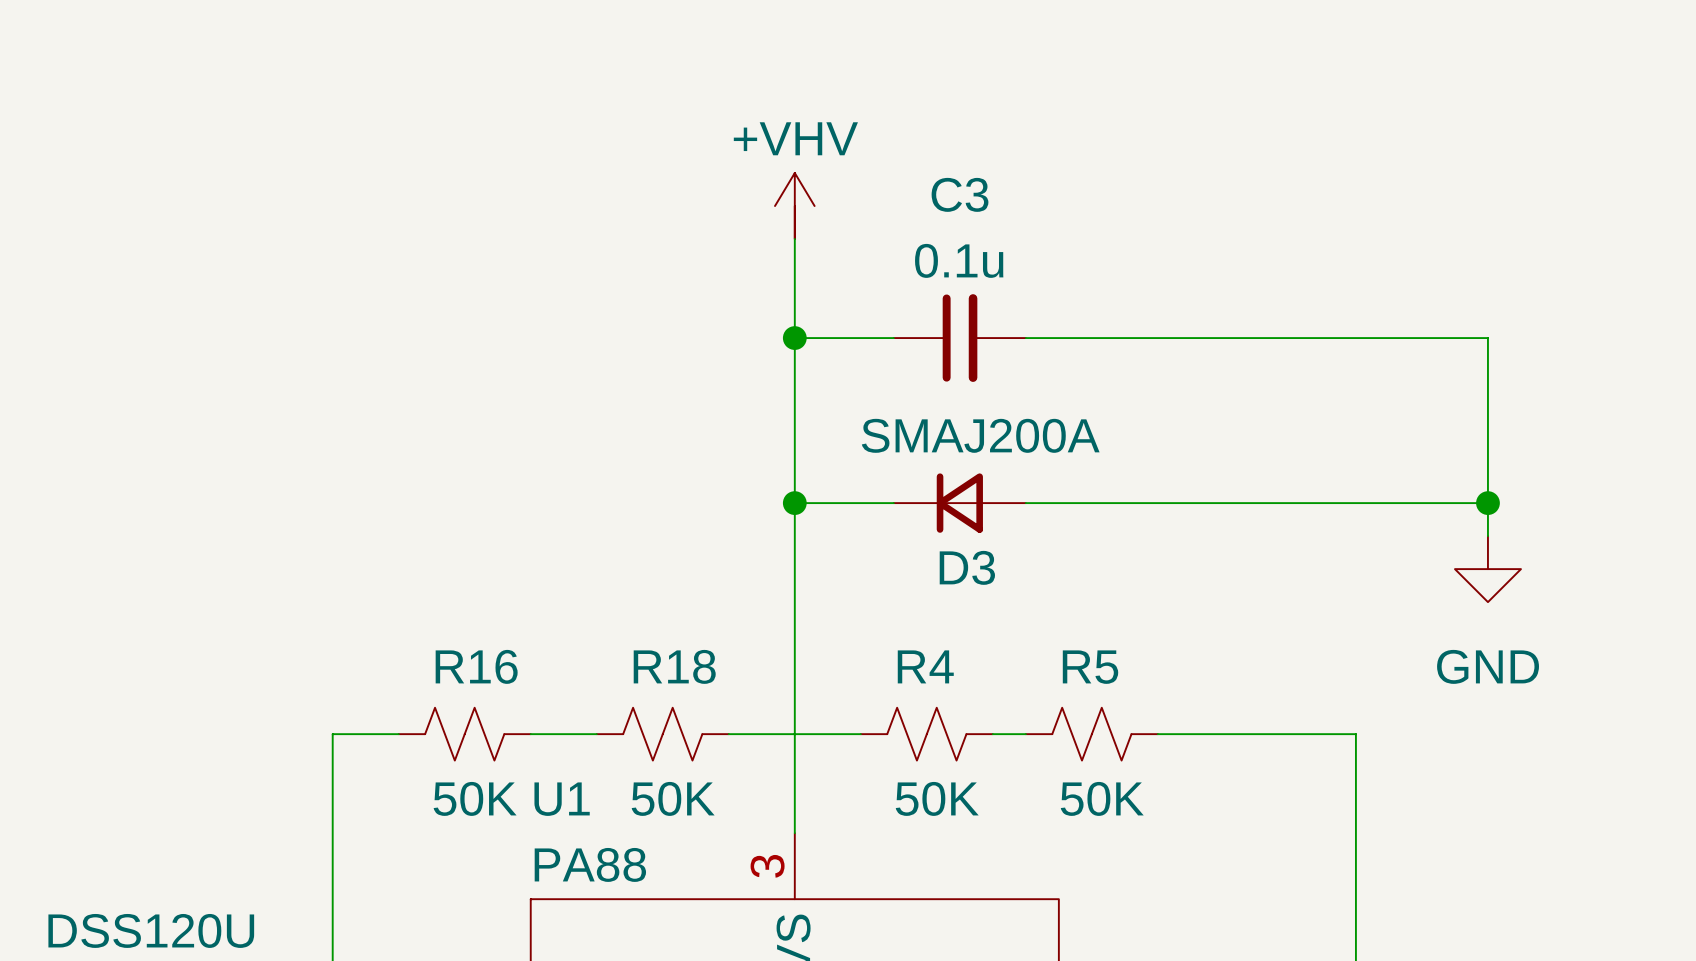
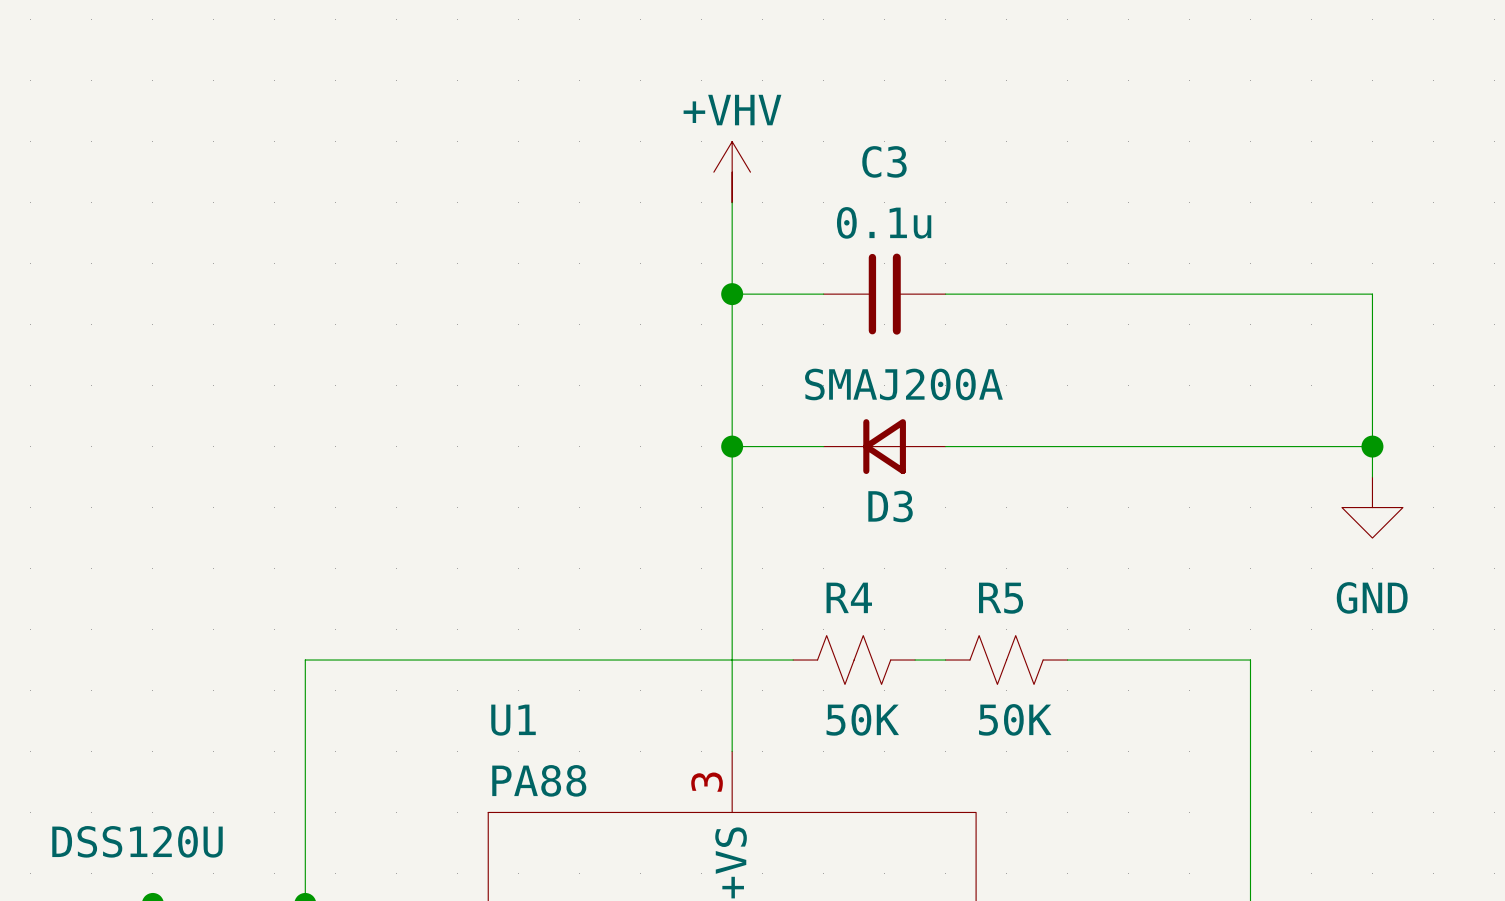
wire: none -> (366, 660) (488, 660)
R16: 50K (464, 734) -> none
wire: none -> (549, 660) (671, 660)
R18: 50K (662, 734) -> none

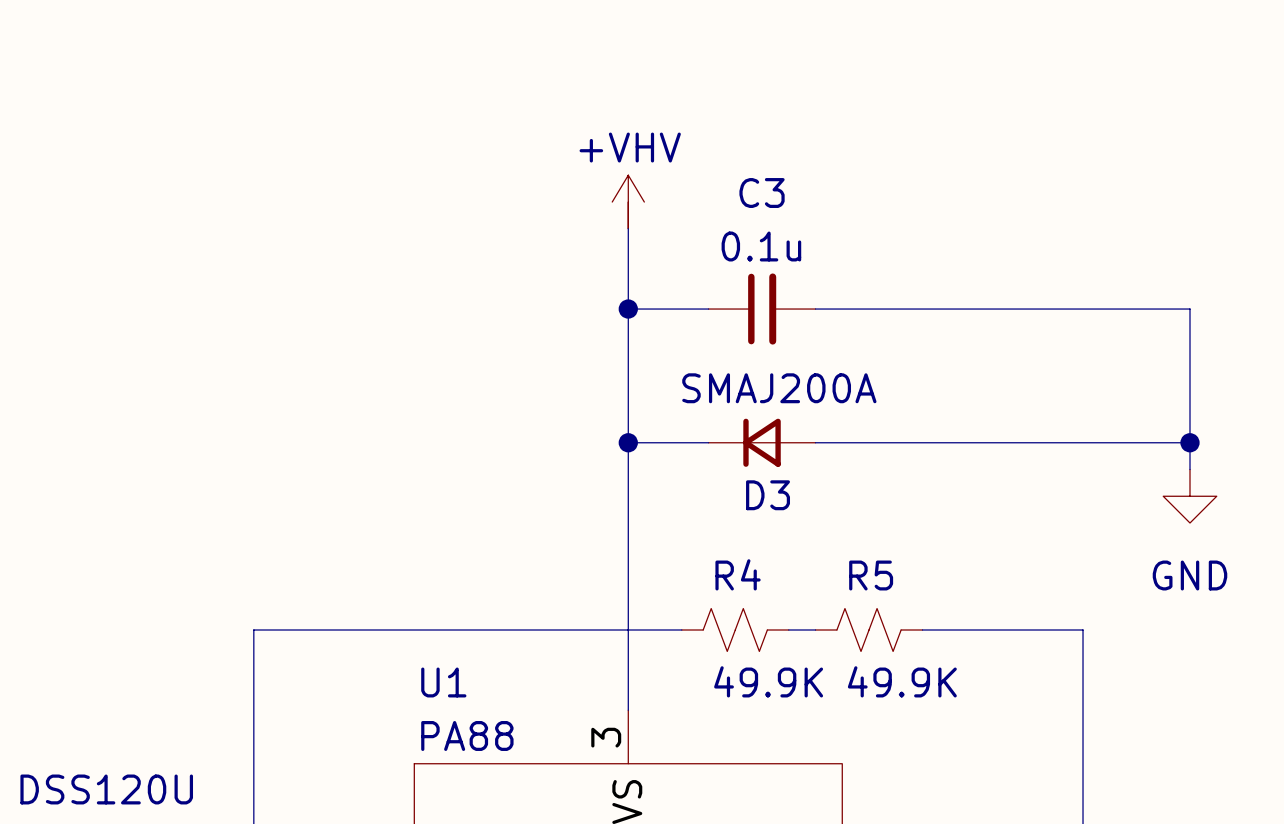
R4 value: 50K (862, 719) -> 49.9K (768, 681)
R5 value: 50K (1015, 719) -> 49.9K (902, 681)

